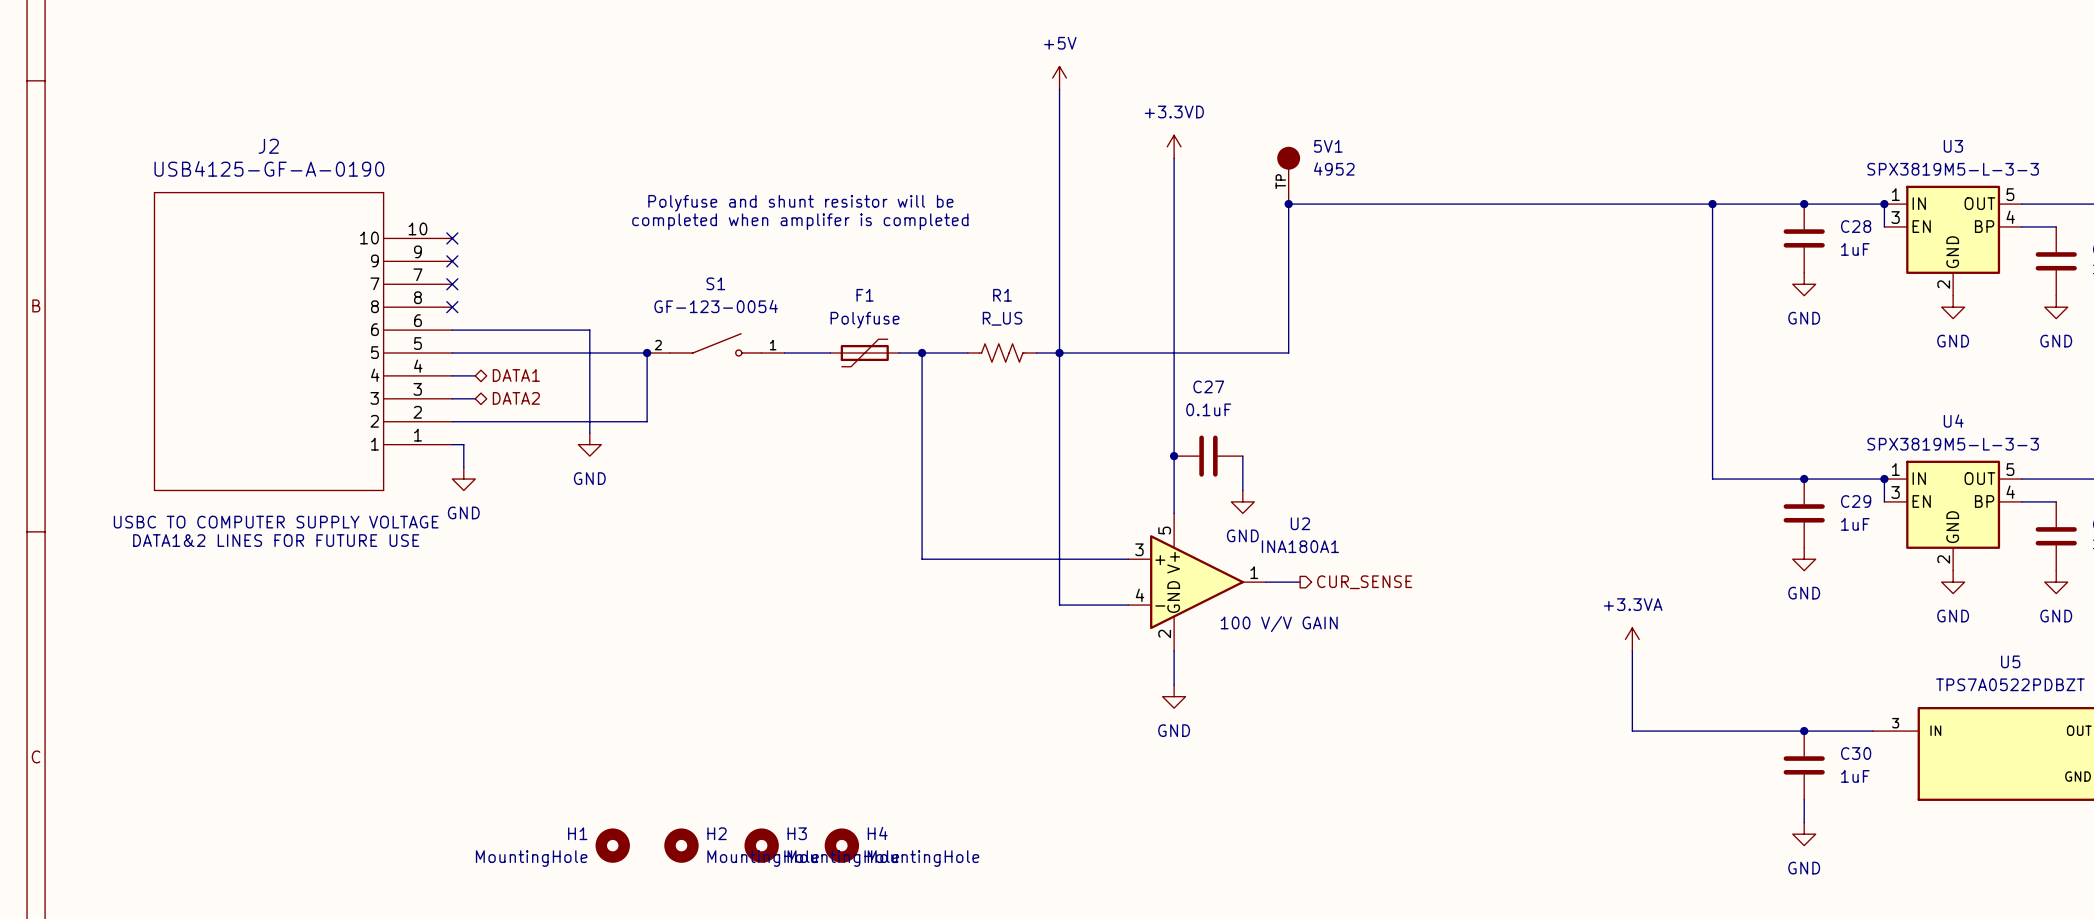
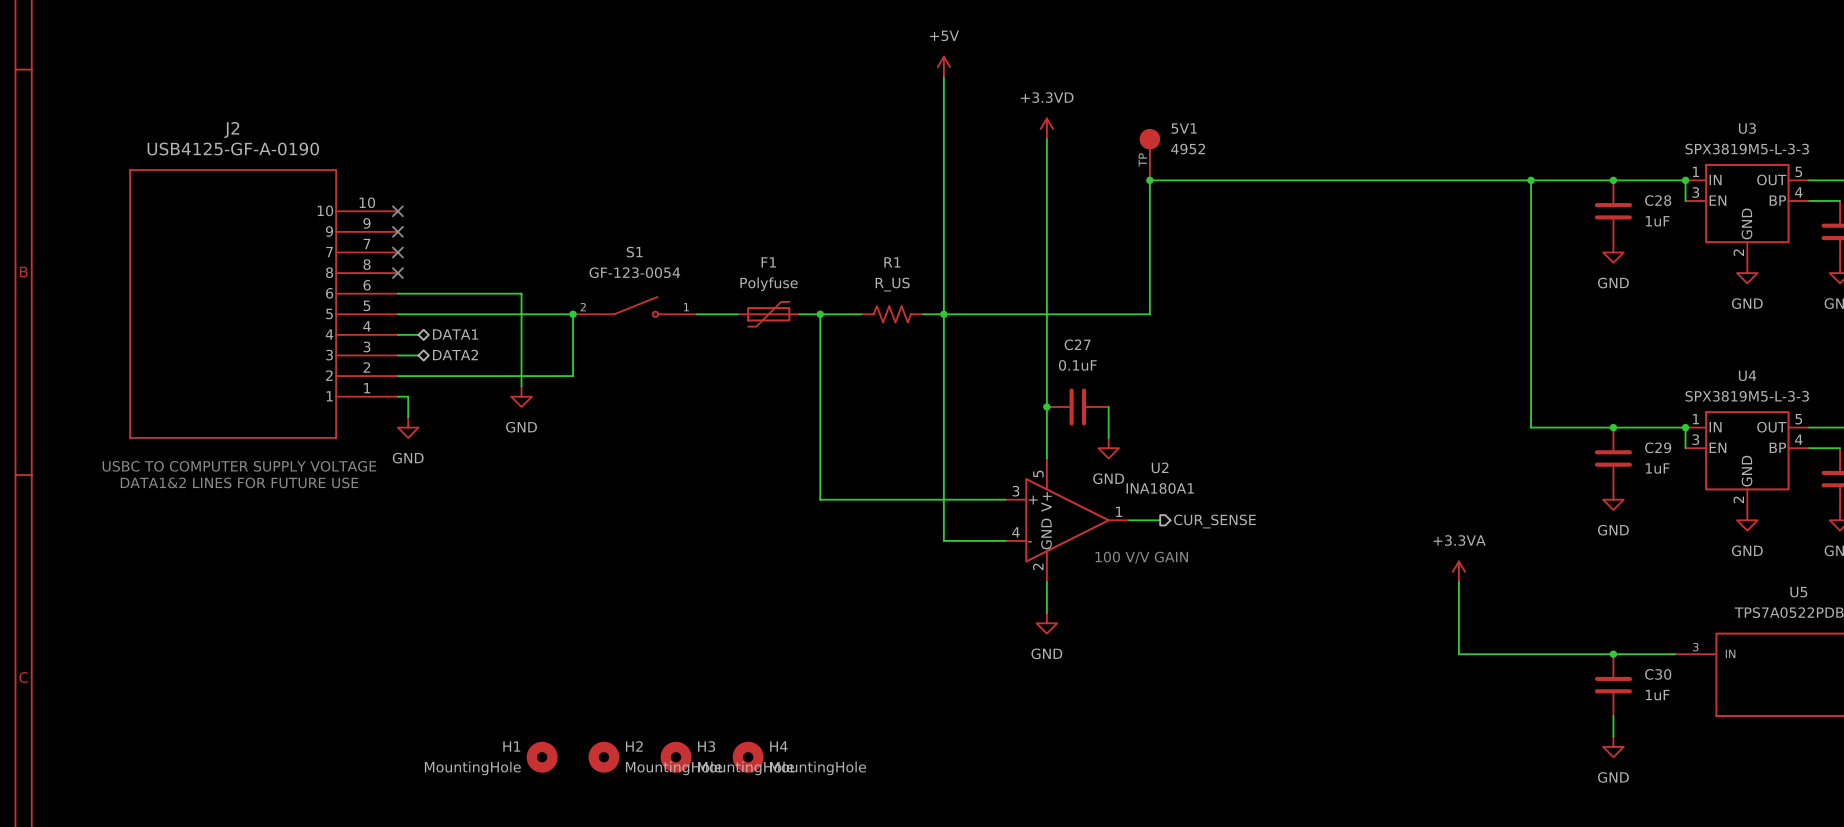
text: Polyfuse and shunt resistor will be (800, 203) -> none
text: completed when amplifer is completed (800, 221) -> none

